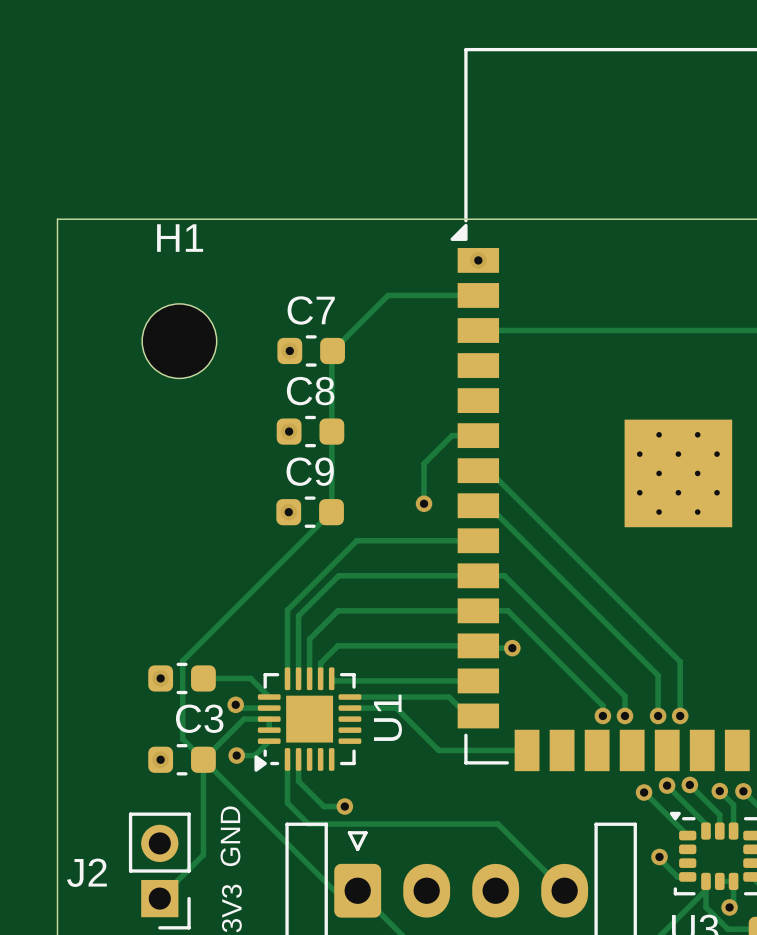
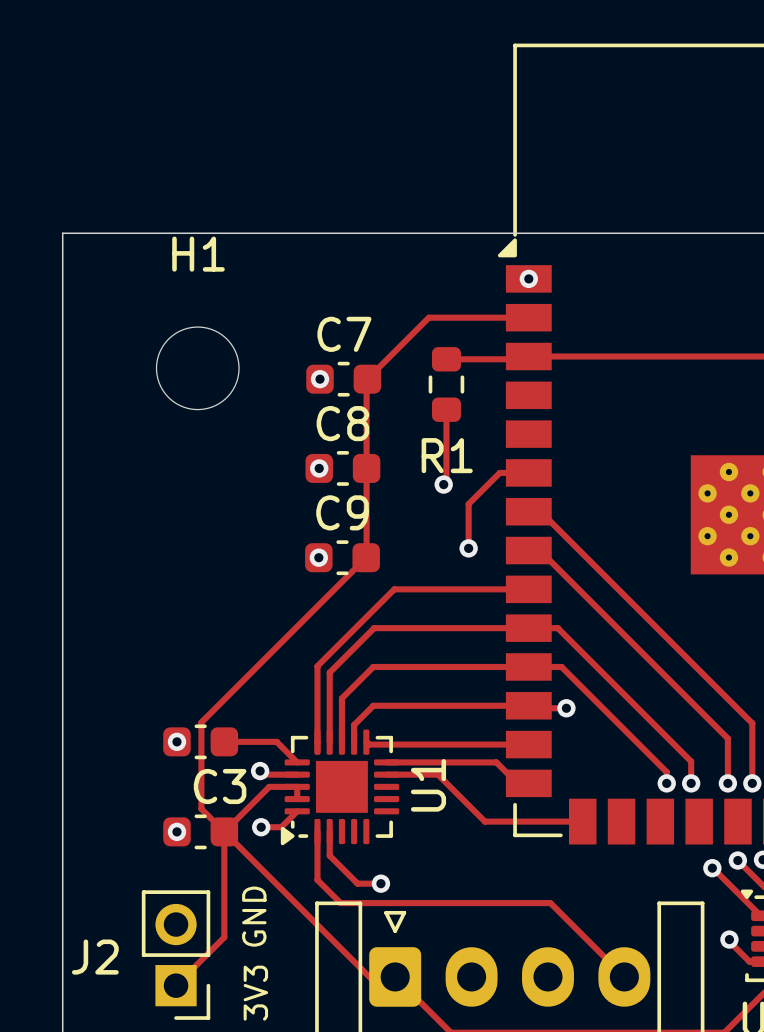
track: none -> (528, 356) (526, 359) (446, 359)
R1: none -> (446, 384)
track: none -> (446, 409) (446, 481) (443, 484)
via: none -> (443, 484)

